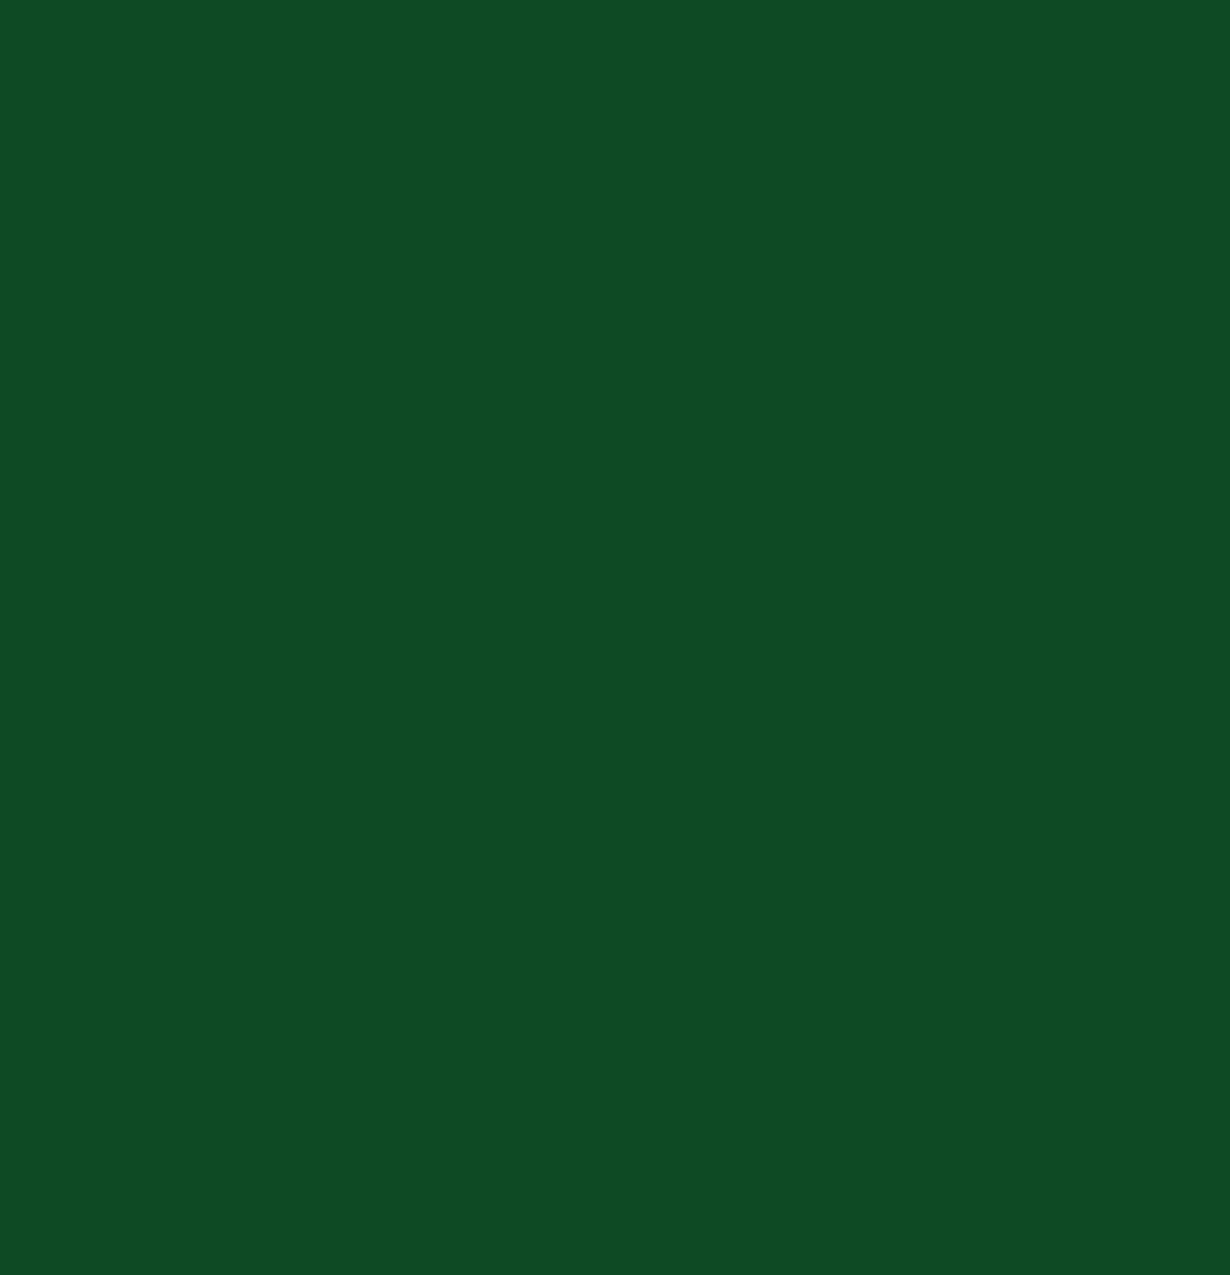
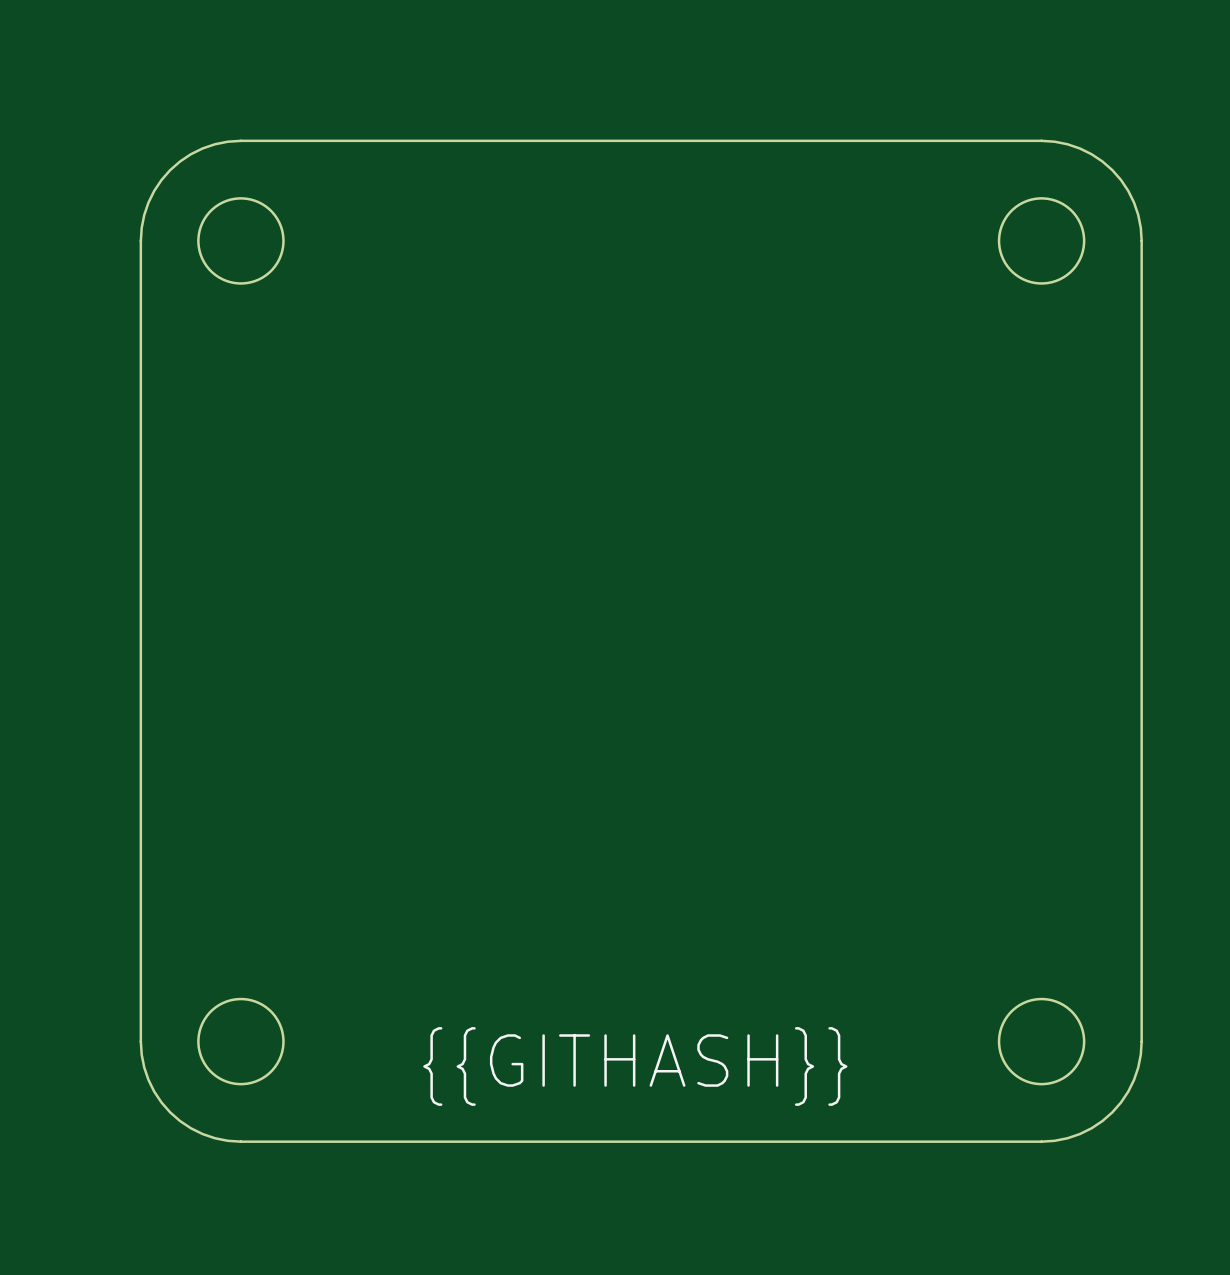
board edge: none -> (240, 140) (1041, 140) (1067, 144) (1079, 148) (1102, 161) (1112, 170) (1120, 180) (1134, 202) (1138, 215) (1141, 240) (1141, 1041) (1140, 1054) (1134, 1079) (1120, 1102) (1112, 1112) (1102, 1120) (1079, 1134) (1067, 1138) (1041, 1141) (240, 1141) (227, 1140) (202, 1134) (180, 1120) (170, 1112) (154, 1091) (148, 1079) (141, 1054) (140, 1041) (141, 227) (148, 202) (154, 190) (170, 170) (180, 161) (202, 148) (215, 144) (240, 140)
round board edge: none -> [197, 197, 285, 285]
round board edge: none -> [997, 197, 1086, 285]
round board edge: none -> [197, 997, 285, 1086]
round board edge: none -> [997, 997, 1086, 1086]
text: none -> {{GITHASH}} (635, 1066)

